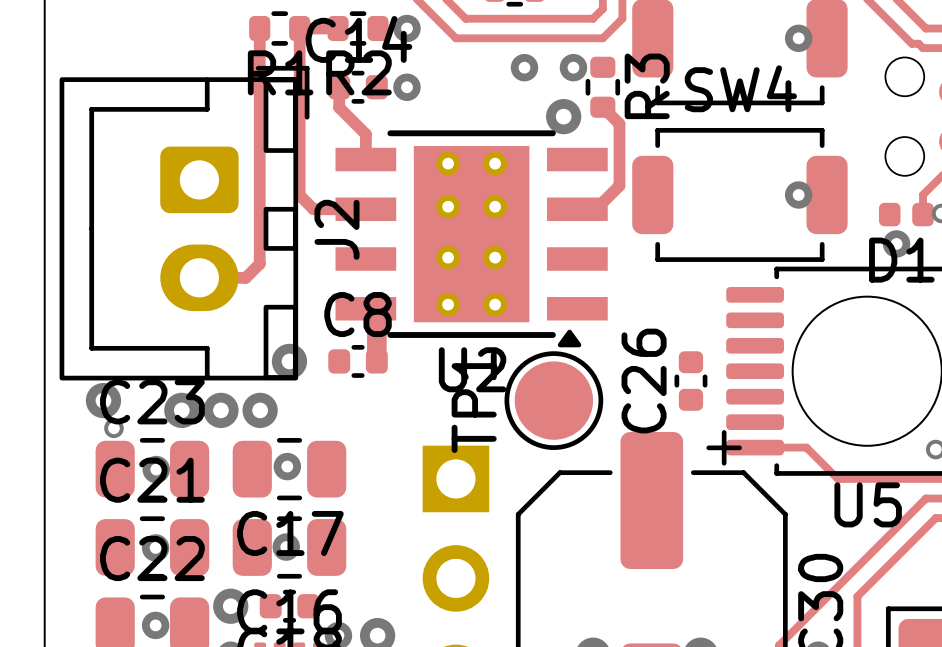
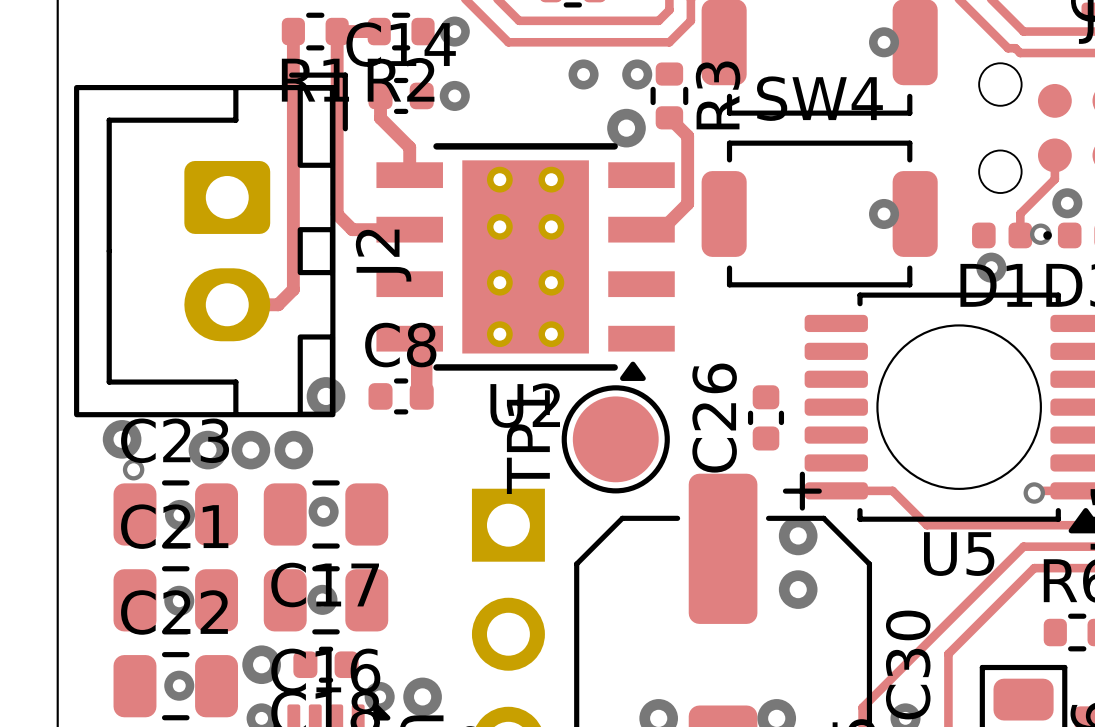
via: none -> (798, 535)
via: none -> (798, 589)

